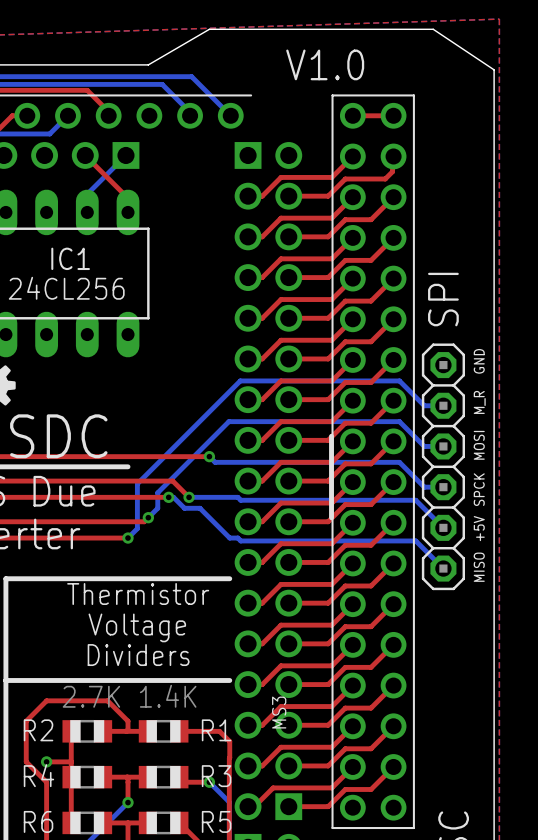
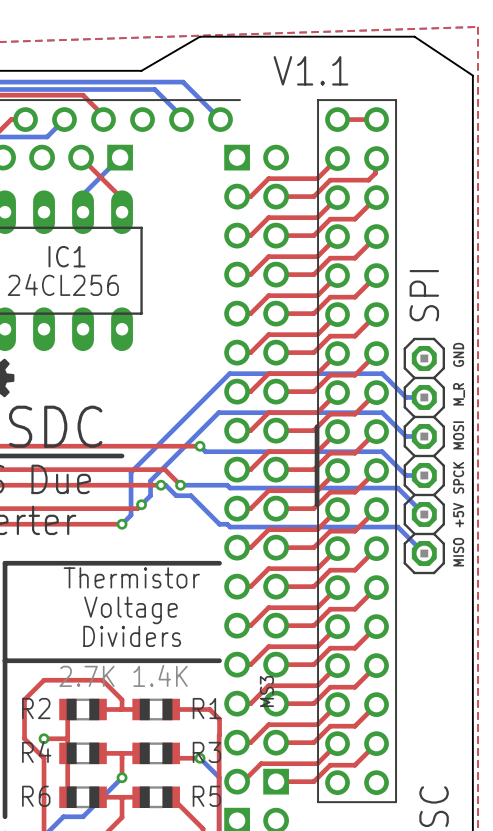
text: V1.0 (325, 64) -> V1.1 (311, 70)

